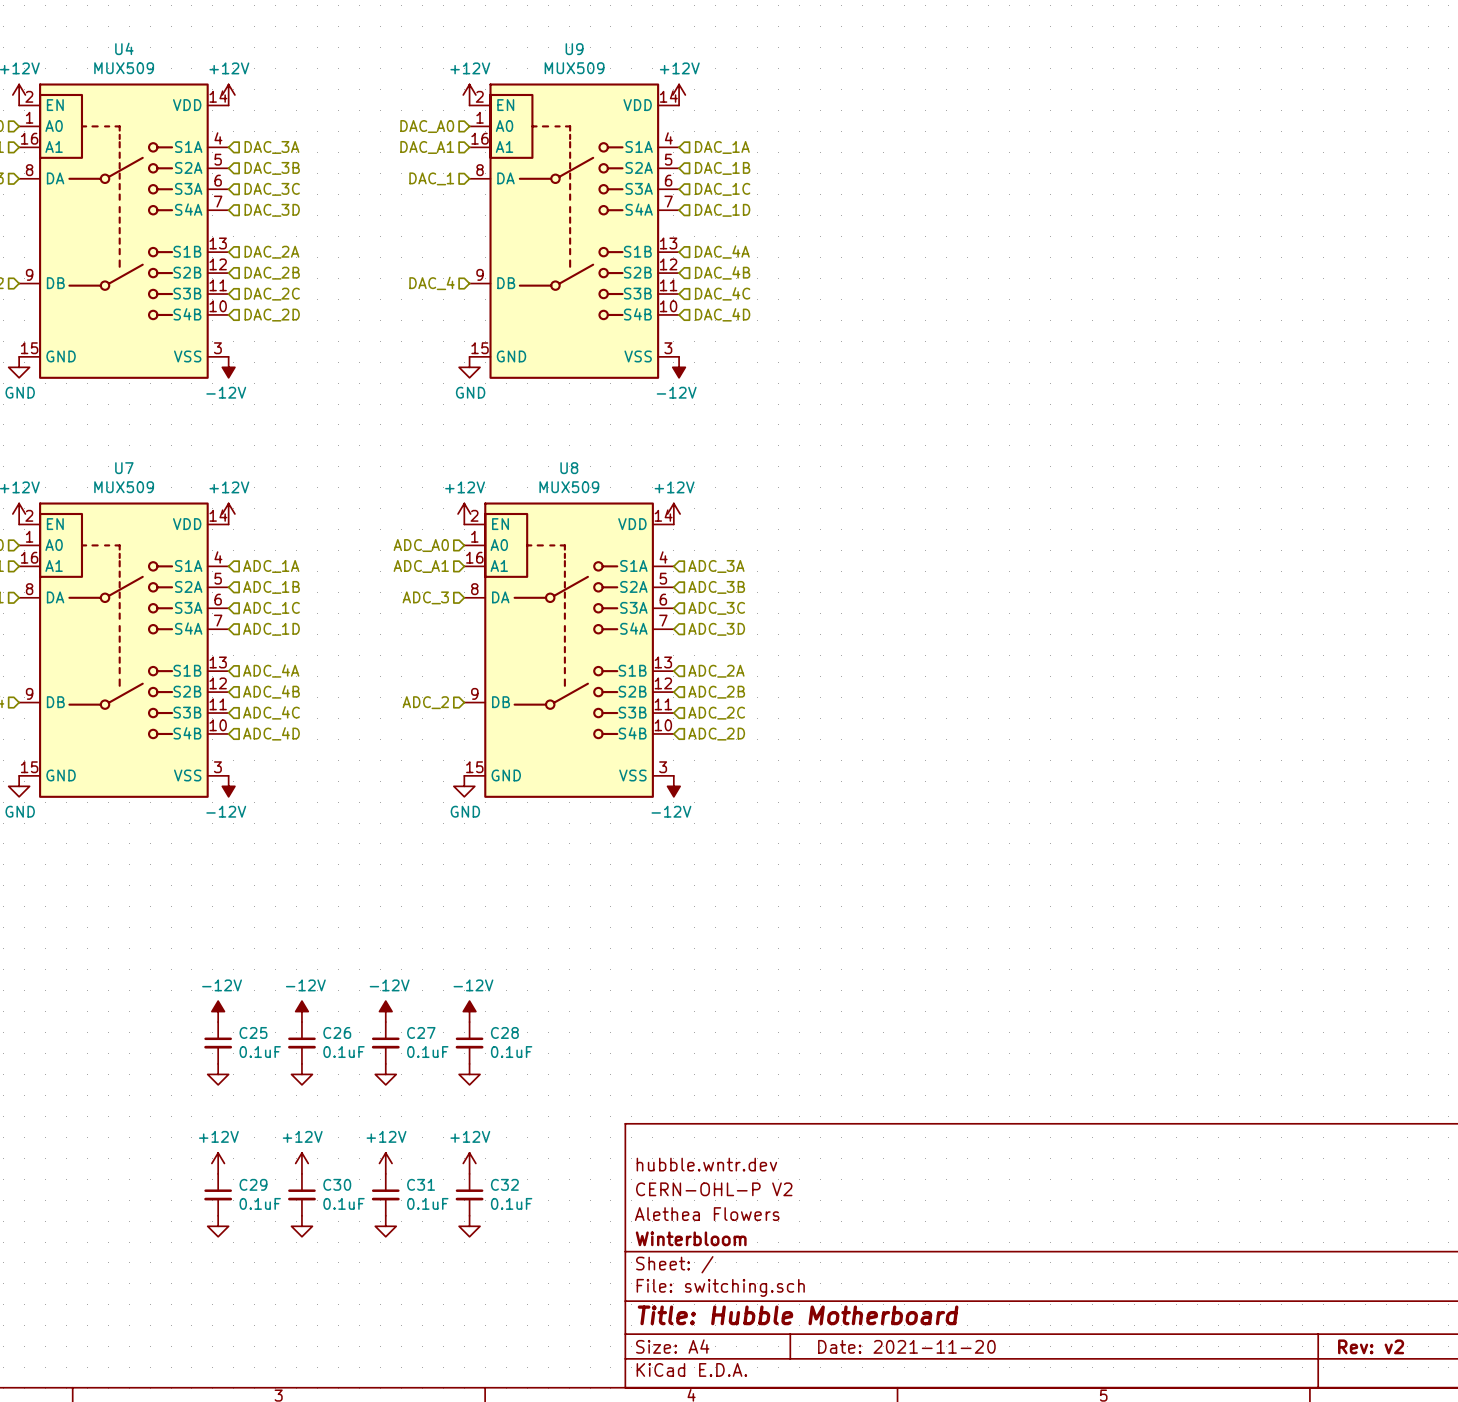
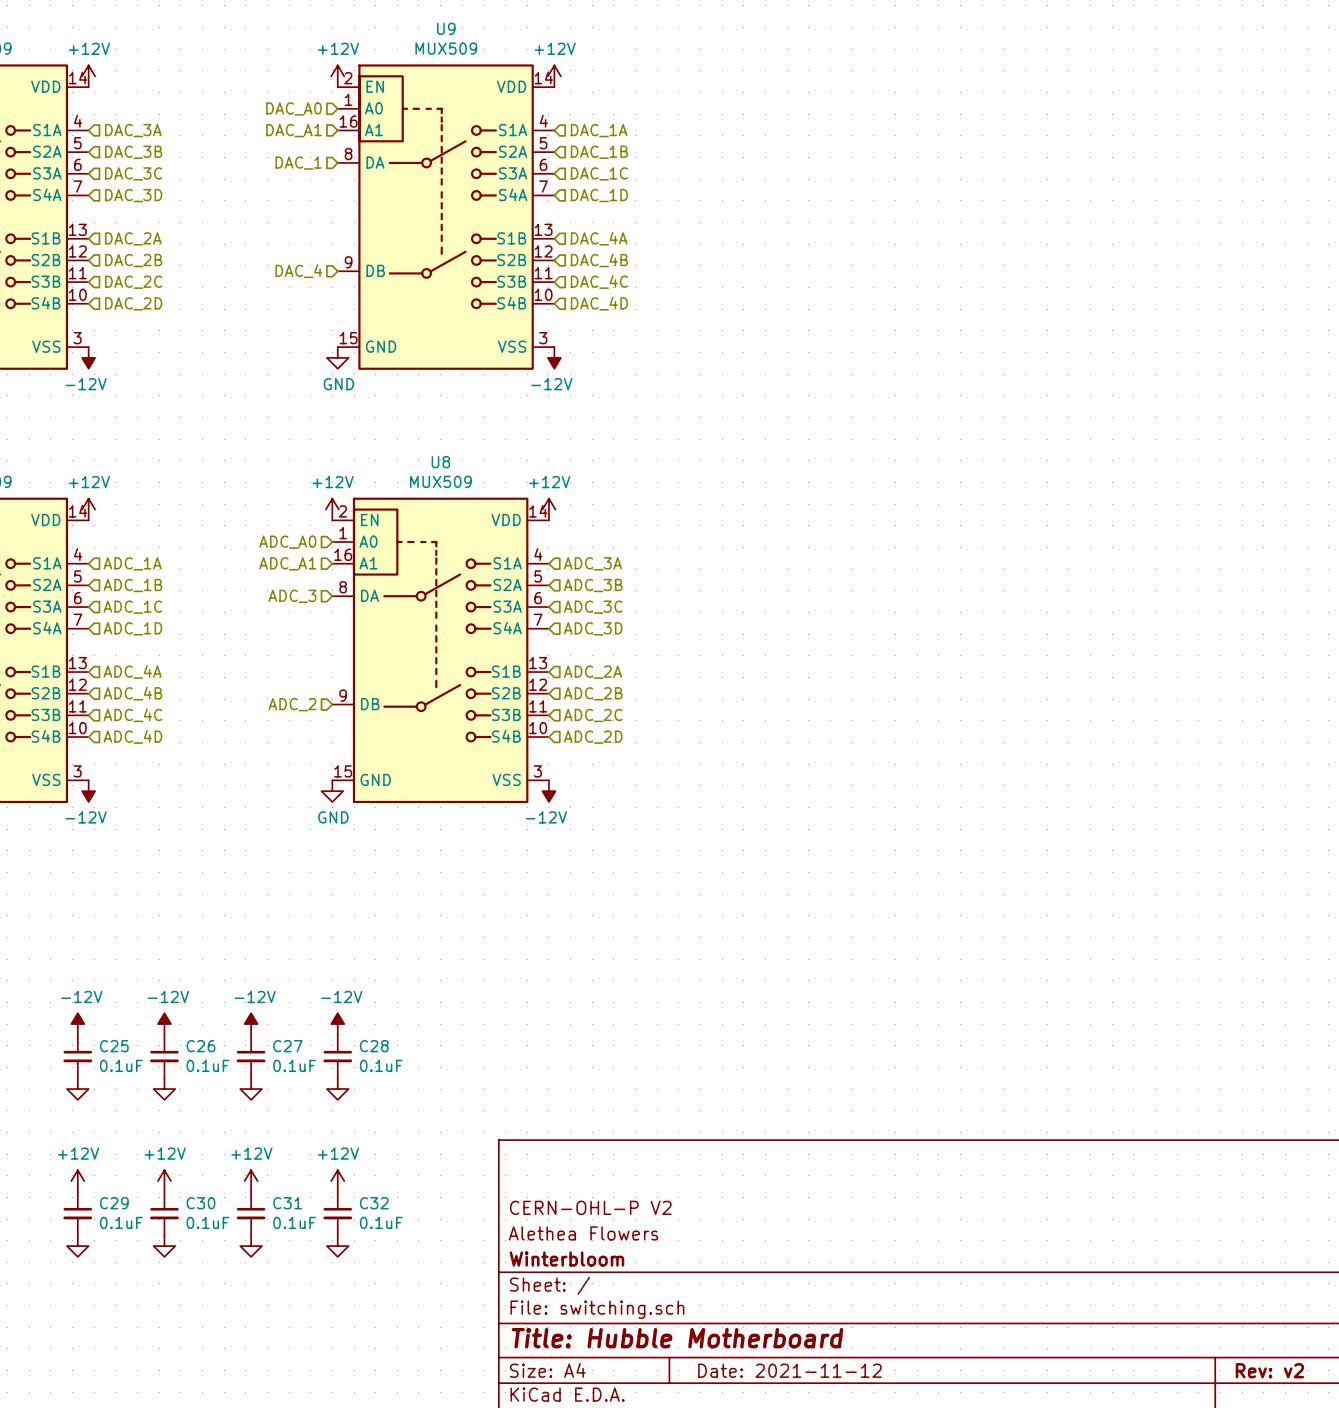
title block: hubble.wntr.dev (706, 1164) -> none
title block: Date: 2021-11-20 (906, 1346) -> Date: 2021-11-12 (789, 1370)

